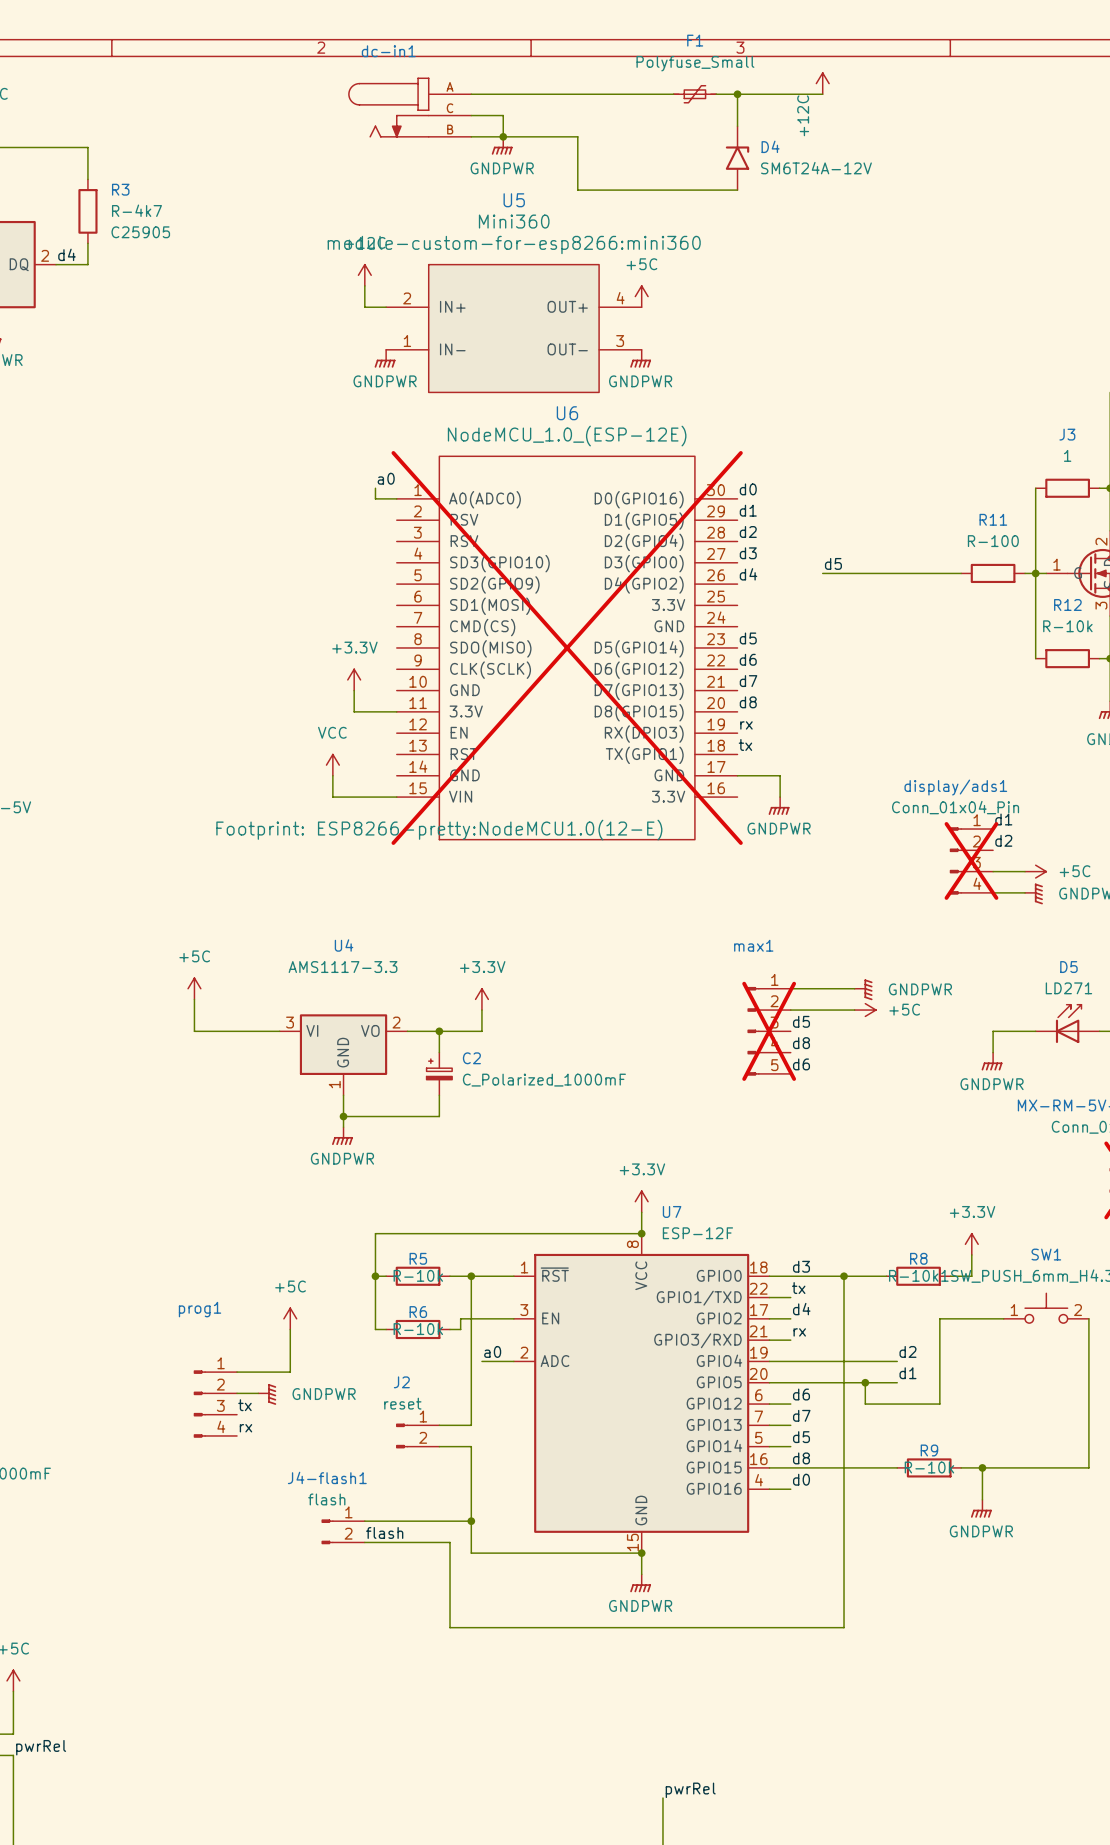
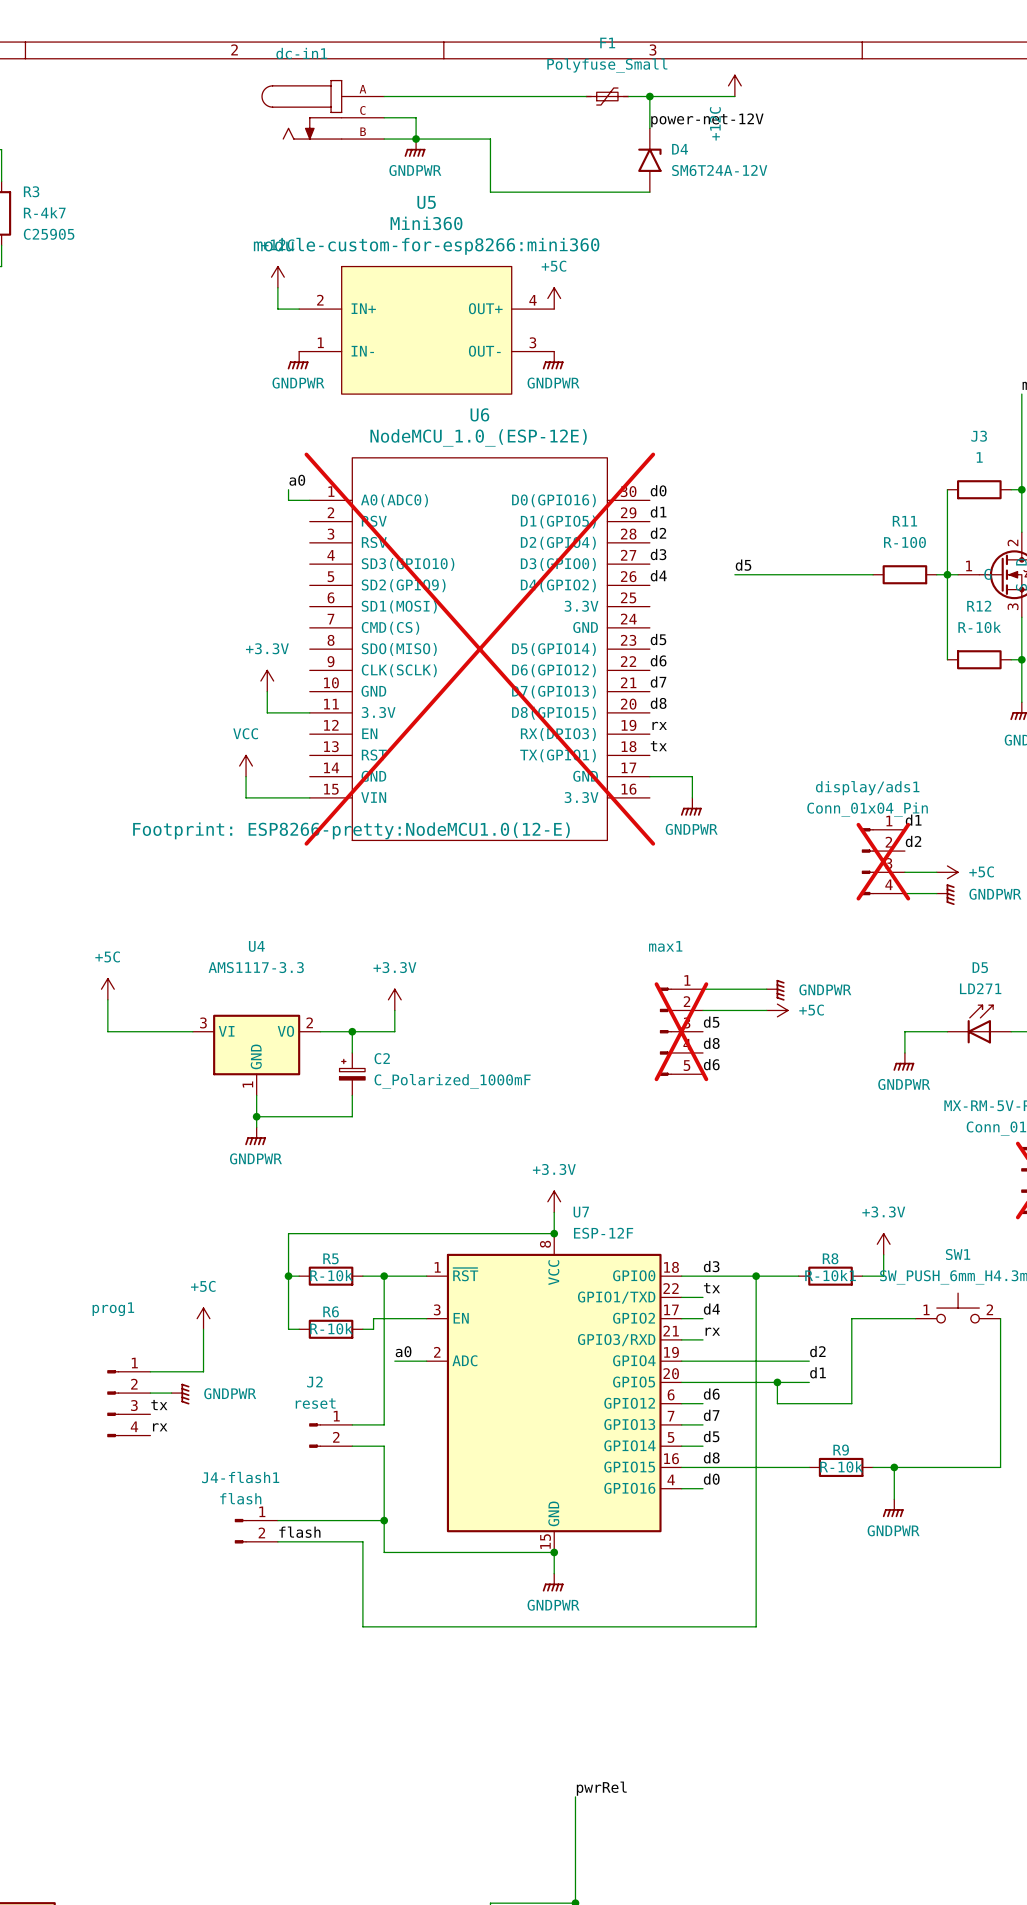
label: none -> power-net-12V (707, 120)

